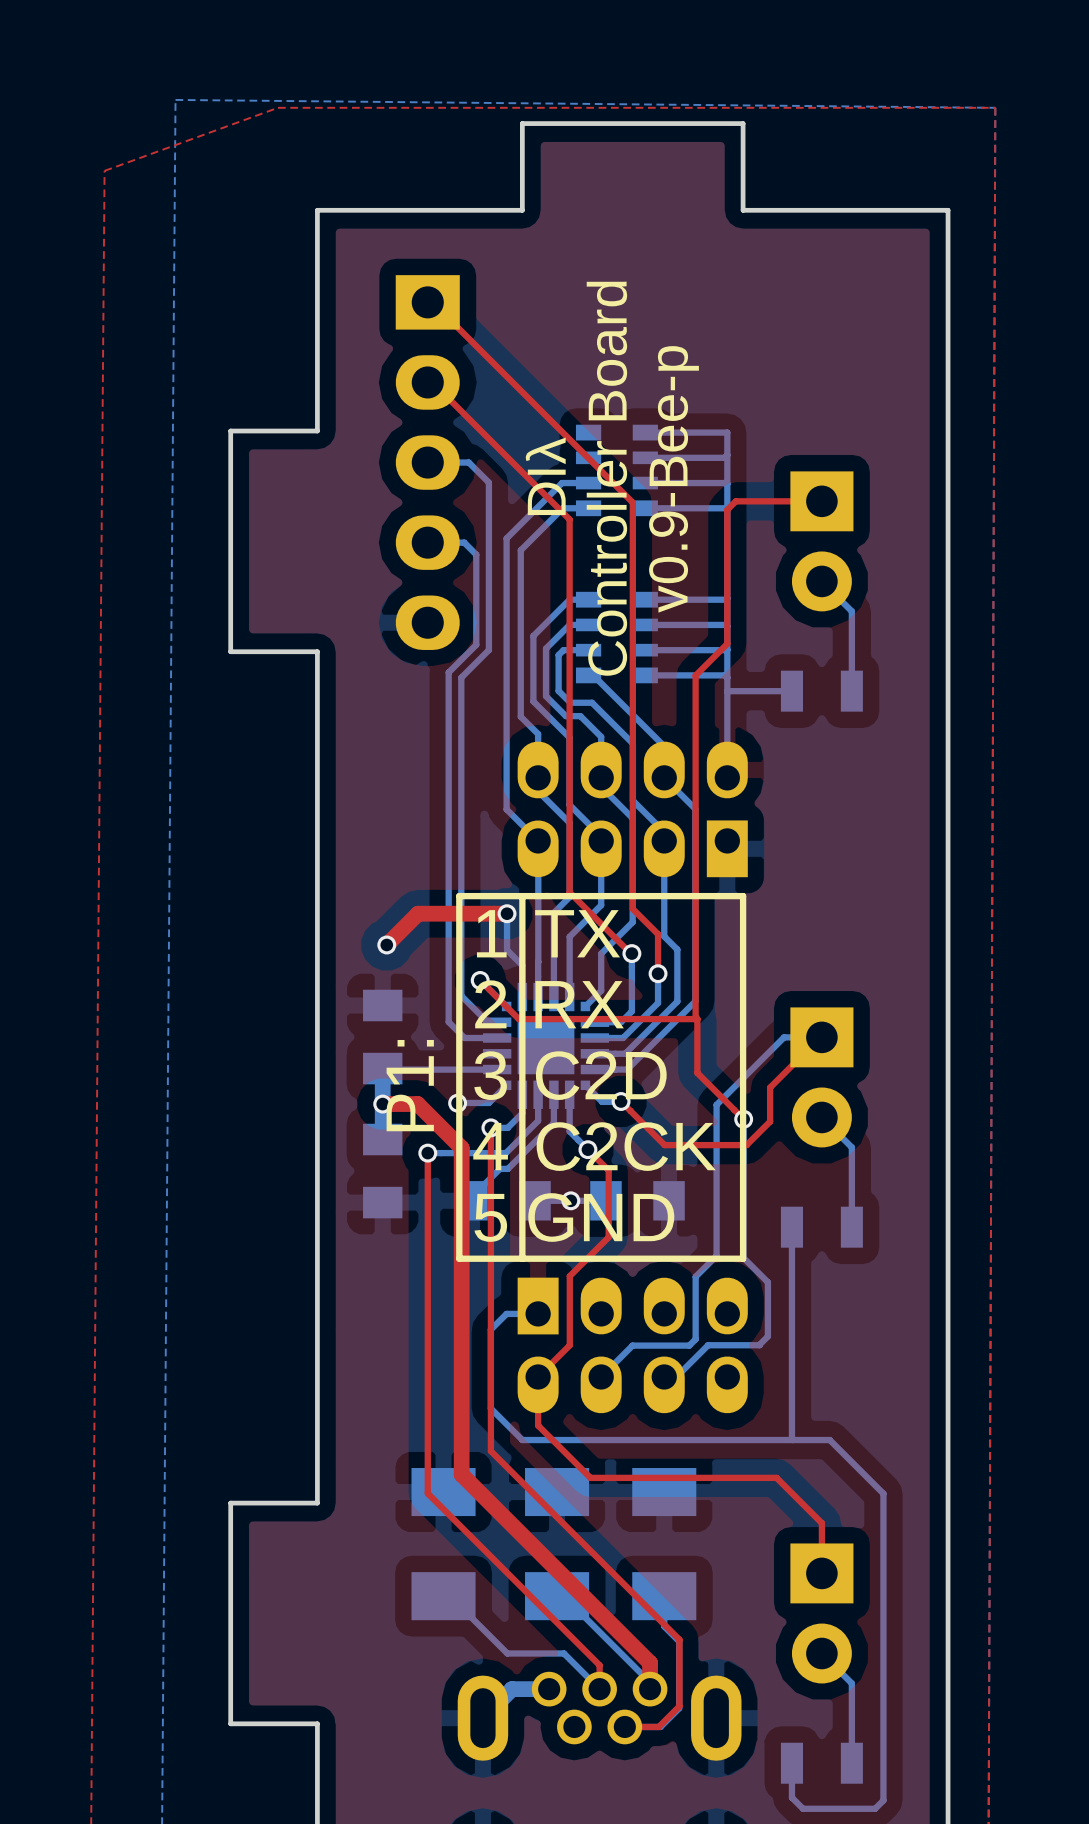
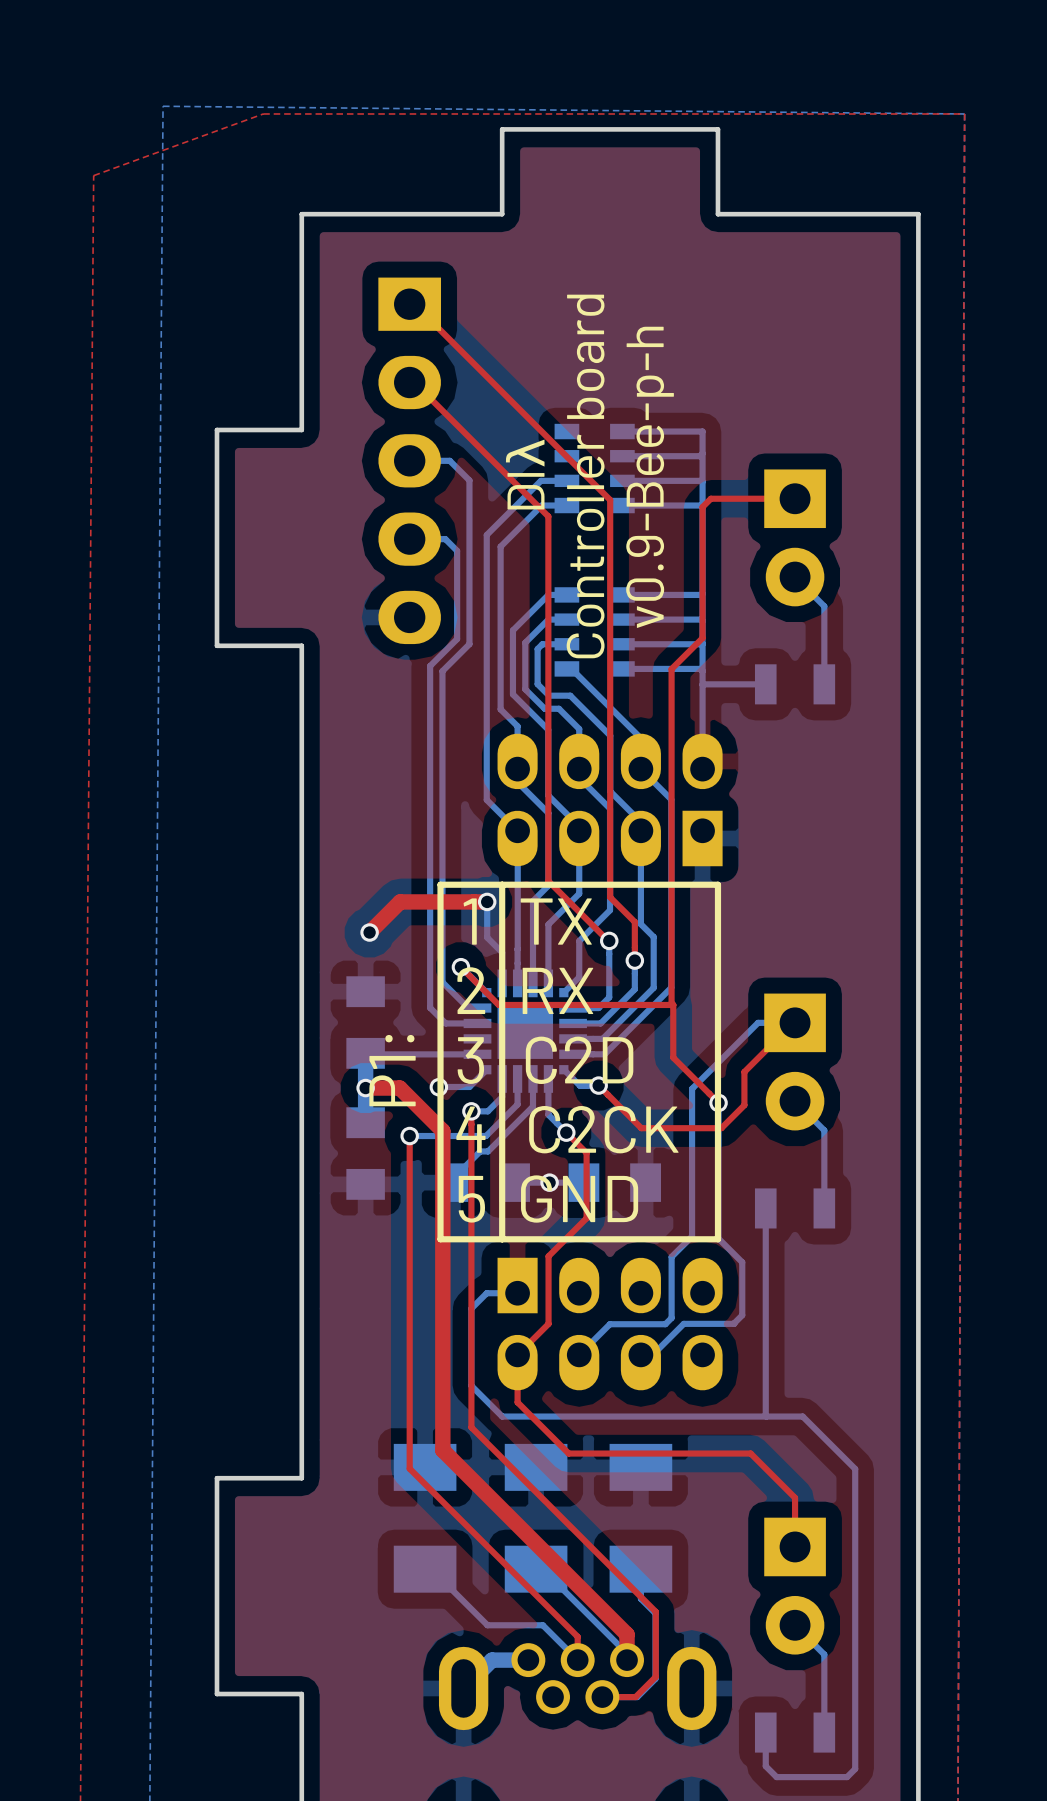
text: Controller Board (606, 478) -> Controller board (585, 476)
text: v0.9-Bee-p (674, 479) -> v0.9-Bee-p-h (650, 477)

